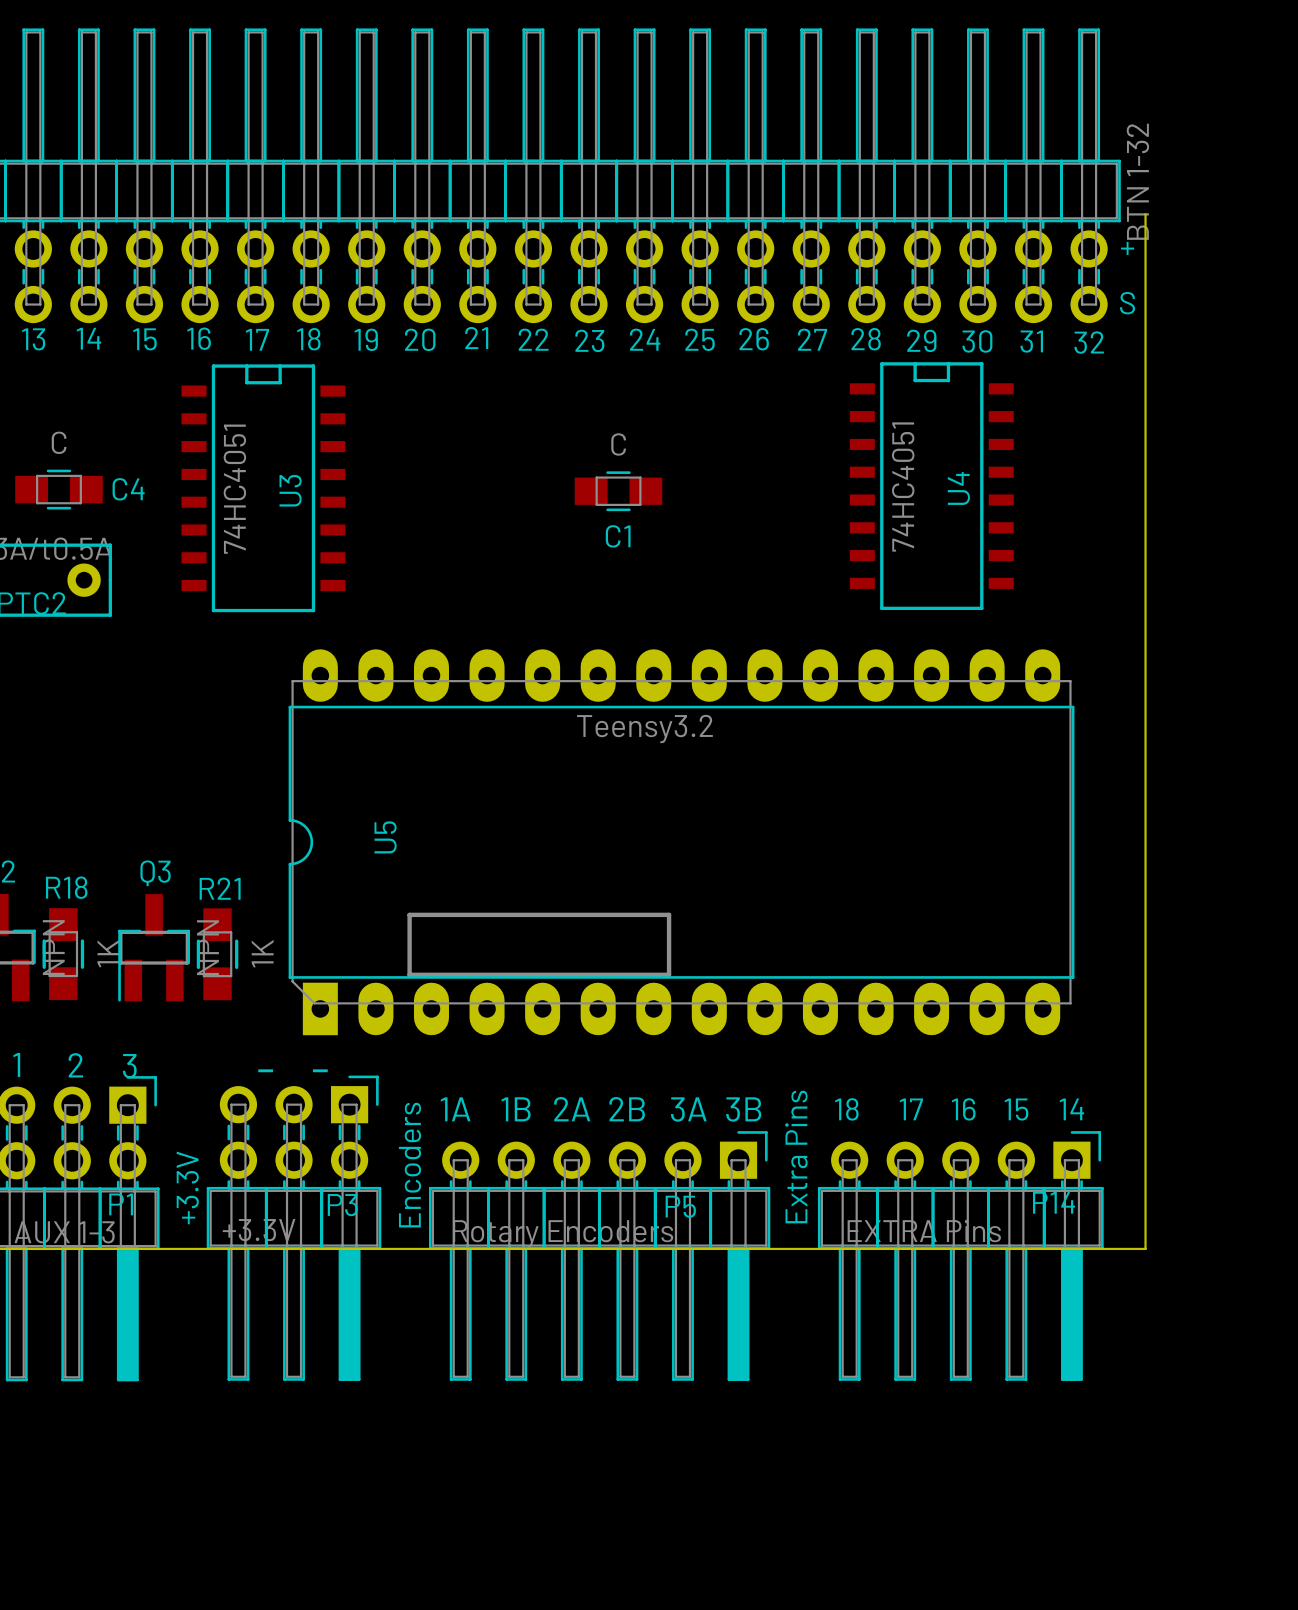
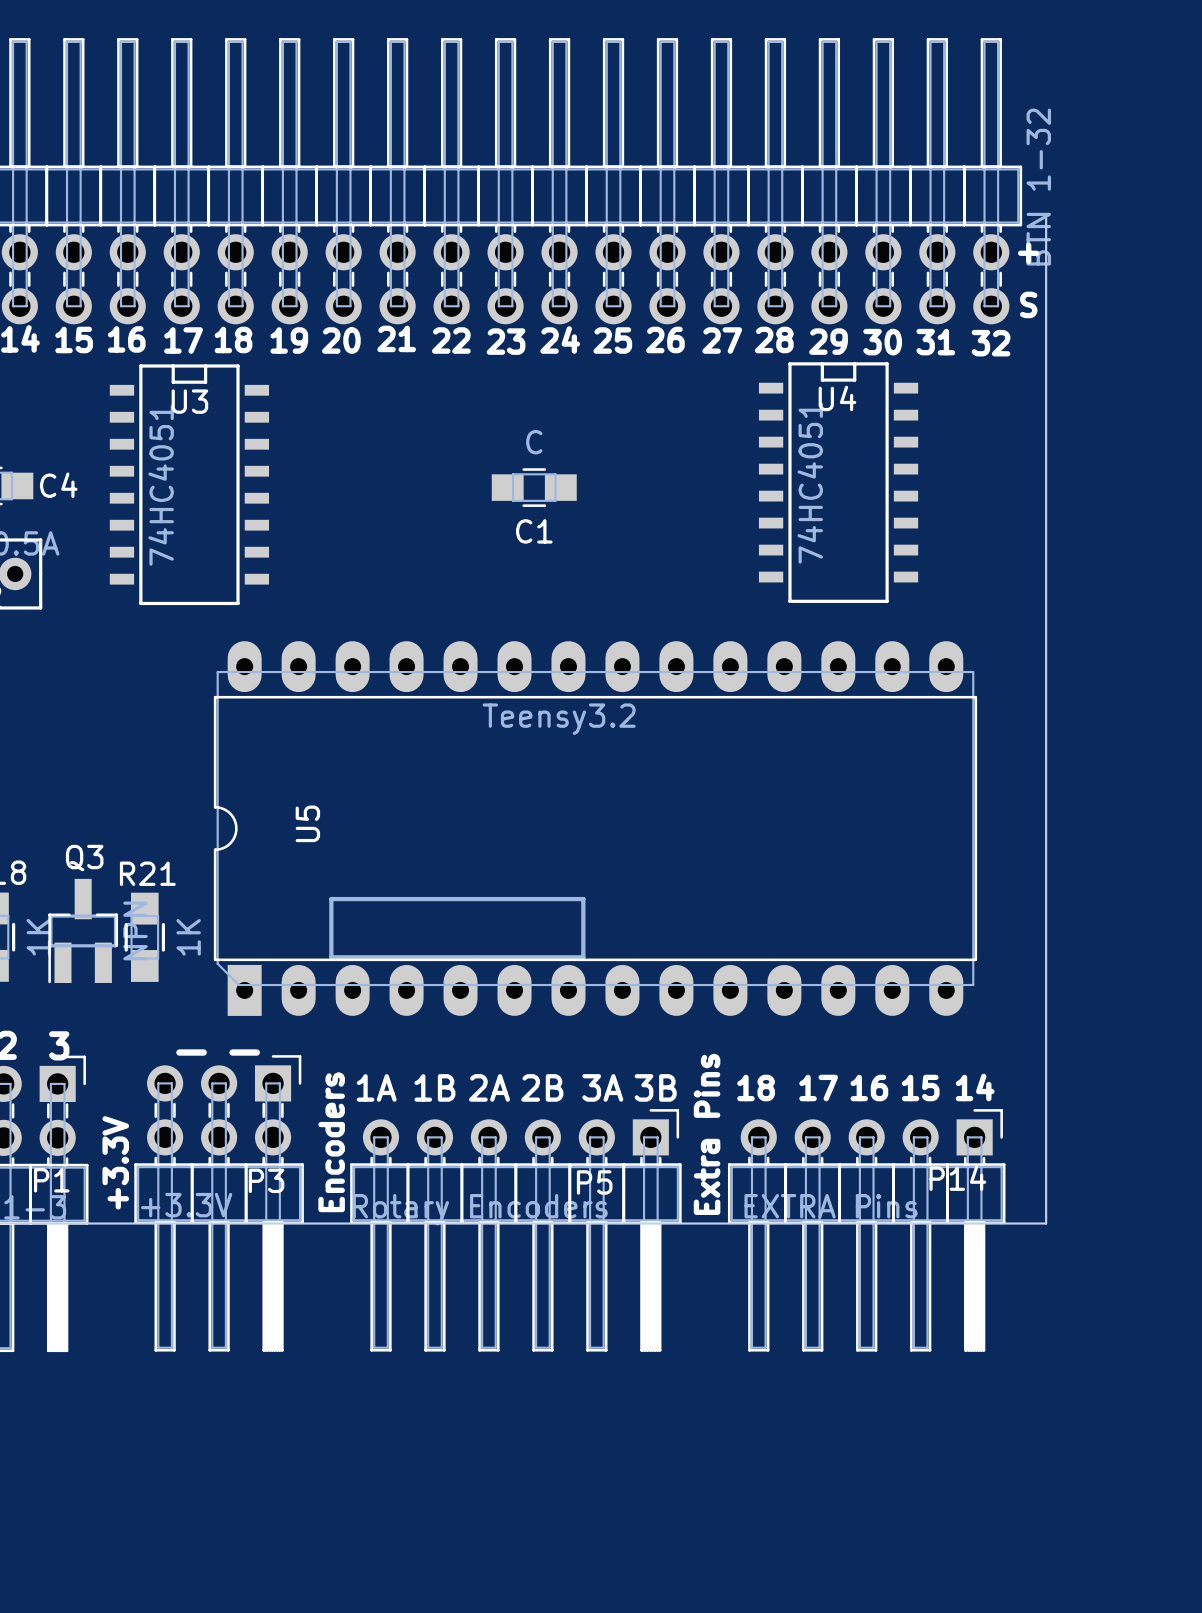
U4 name rotation: 0° (958, 488) -> 90° clockwise (837, 398)
U4 name position: U4 (958, 488) -> U4 (837, 398)
U3 name rotation: 0° (290, 490) -> 90° clockwise (189, 401)
U3 name position: U3 (290, 490) -> U3 (189, 401)

